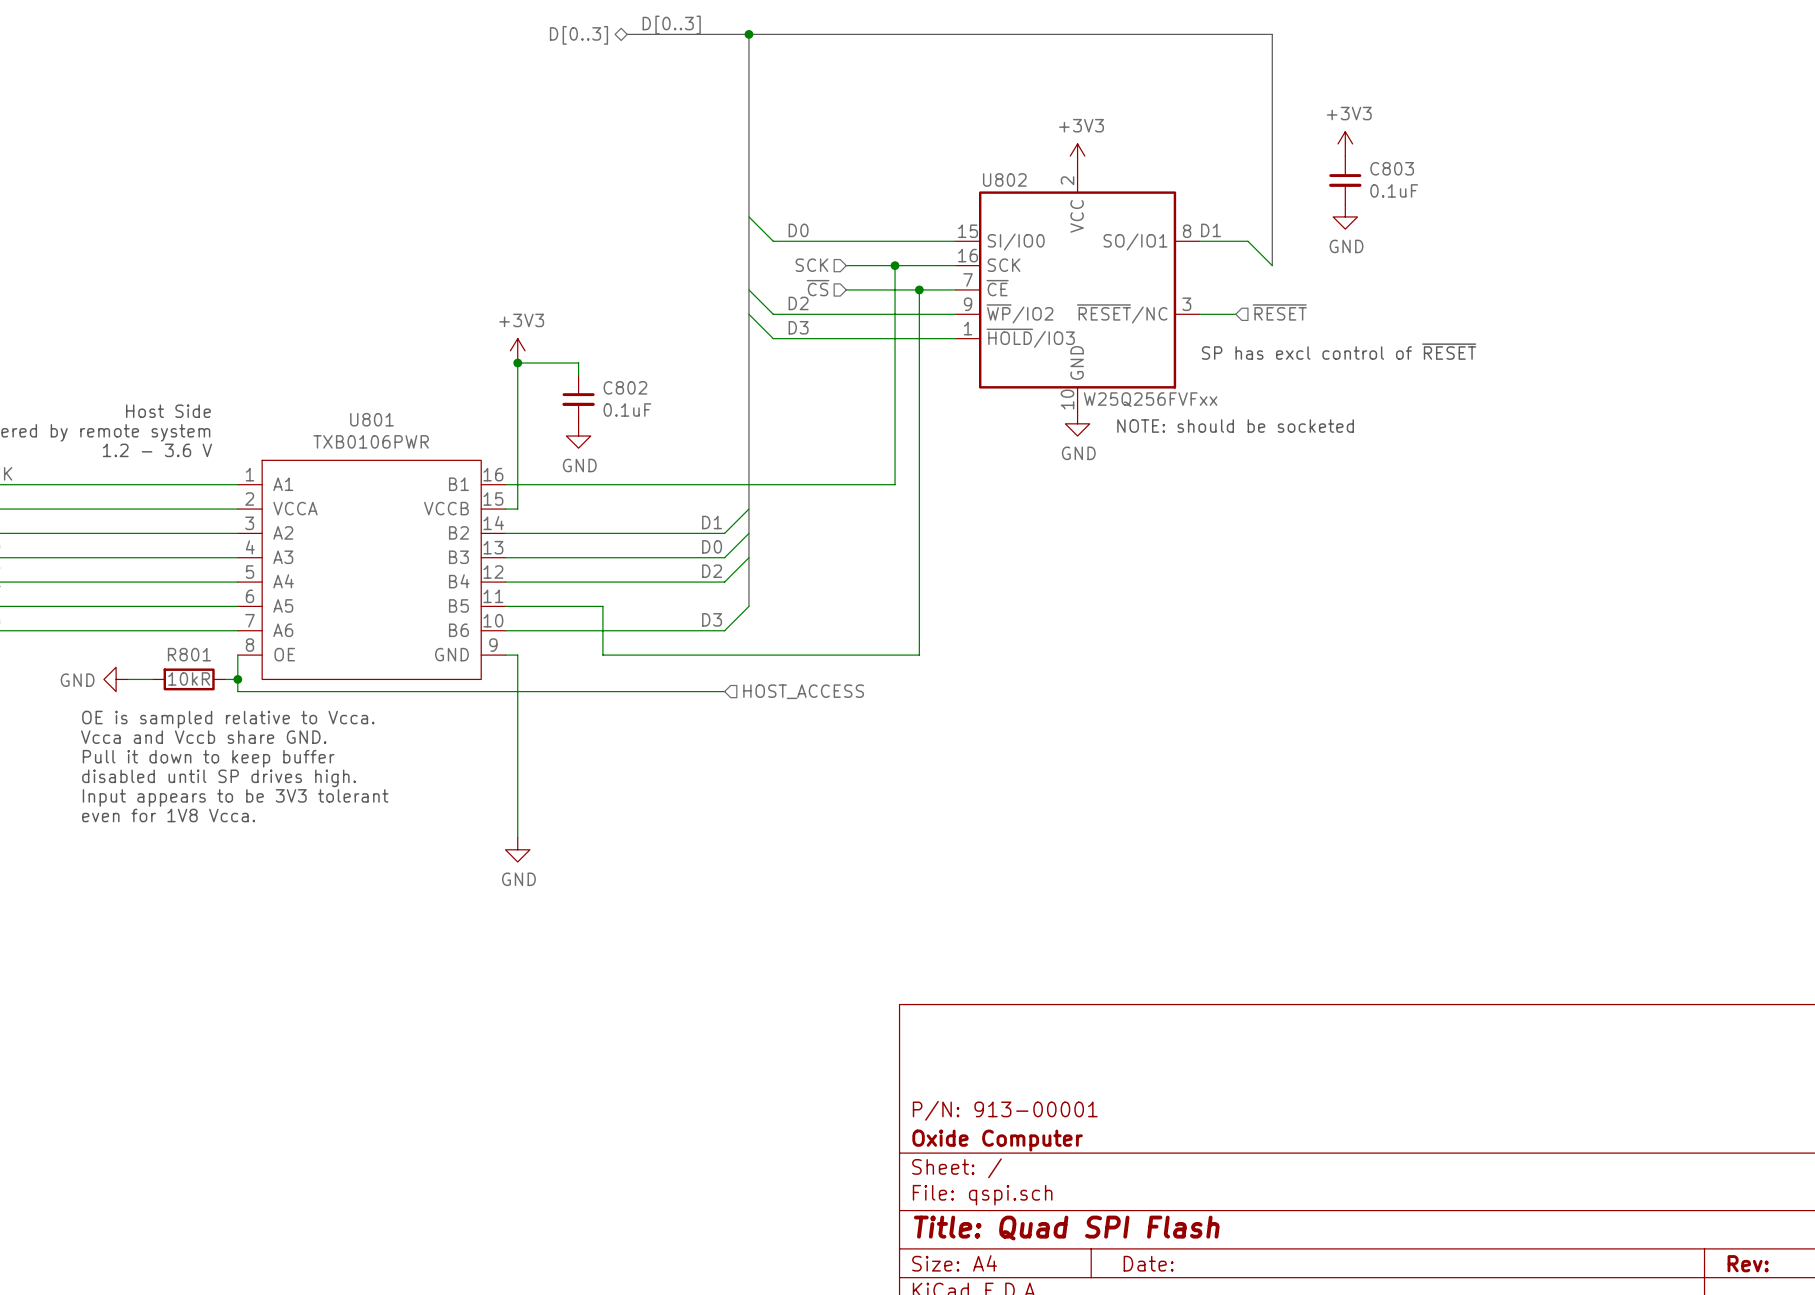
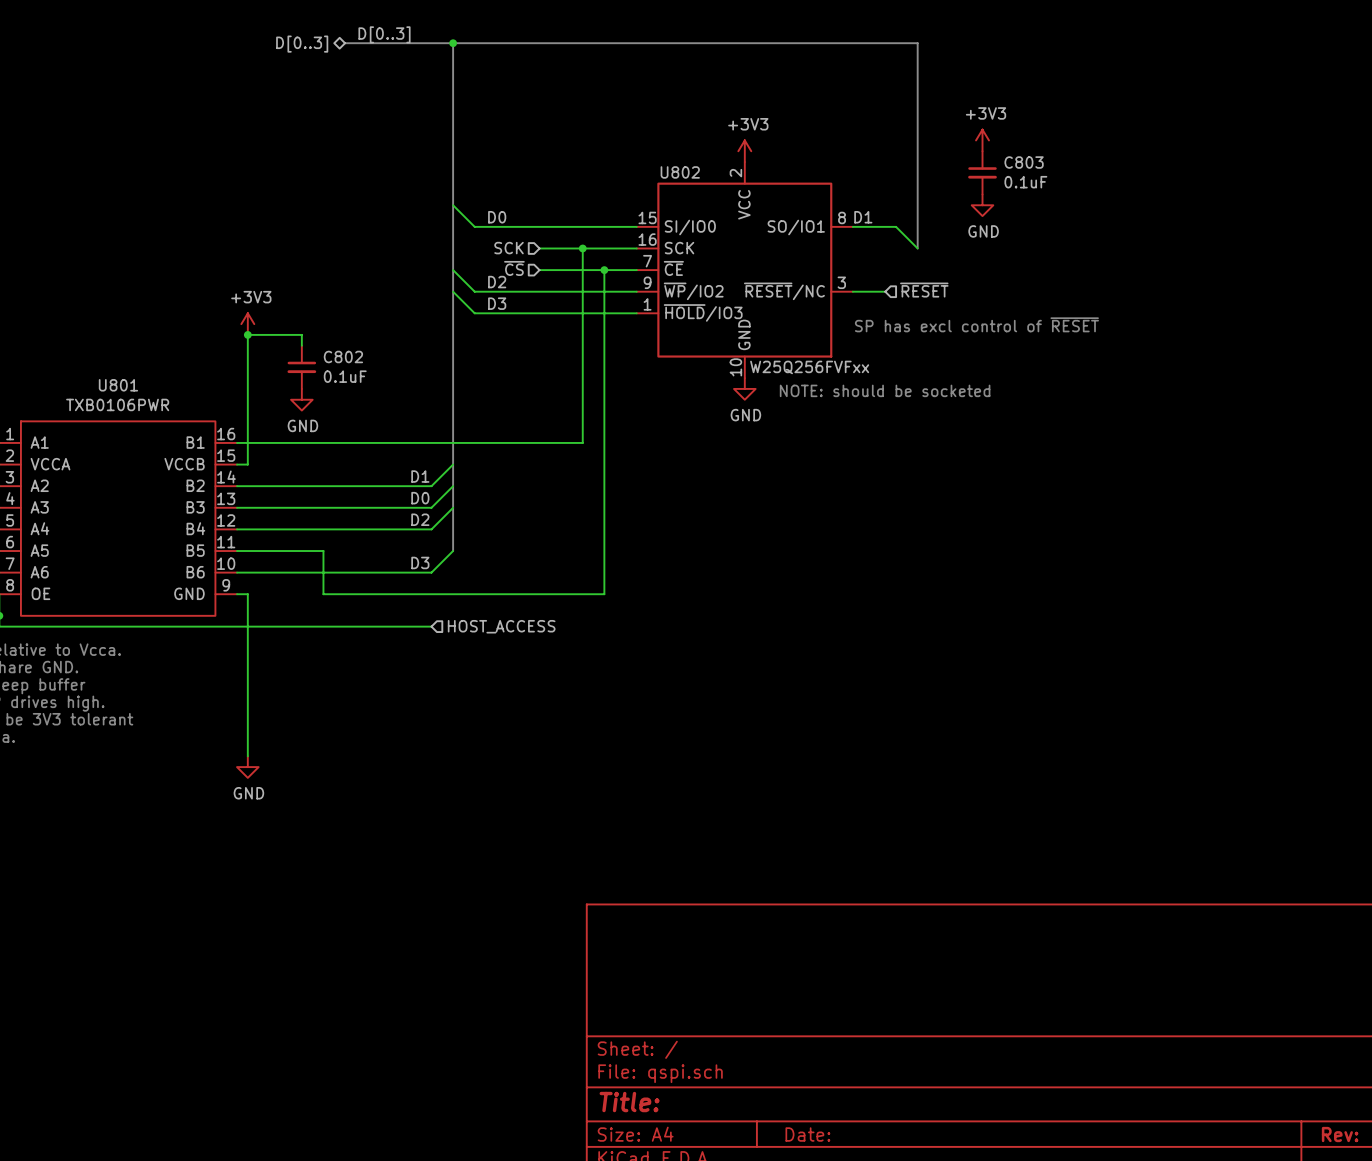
title block: P/N: 913-00001 (1005, 1110) -> none
title block: Oxide Computer (997, 1140) -> none
title block: Title: Quad SPI Flash (1066, 1228) -> Title: (629, 1102)

